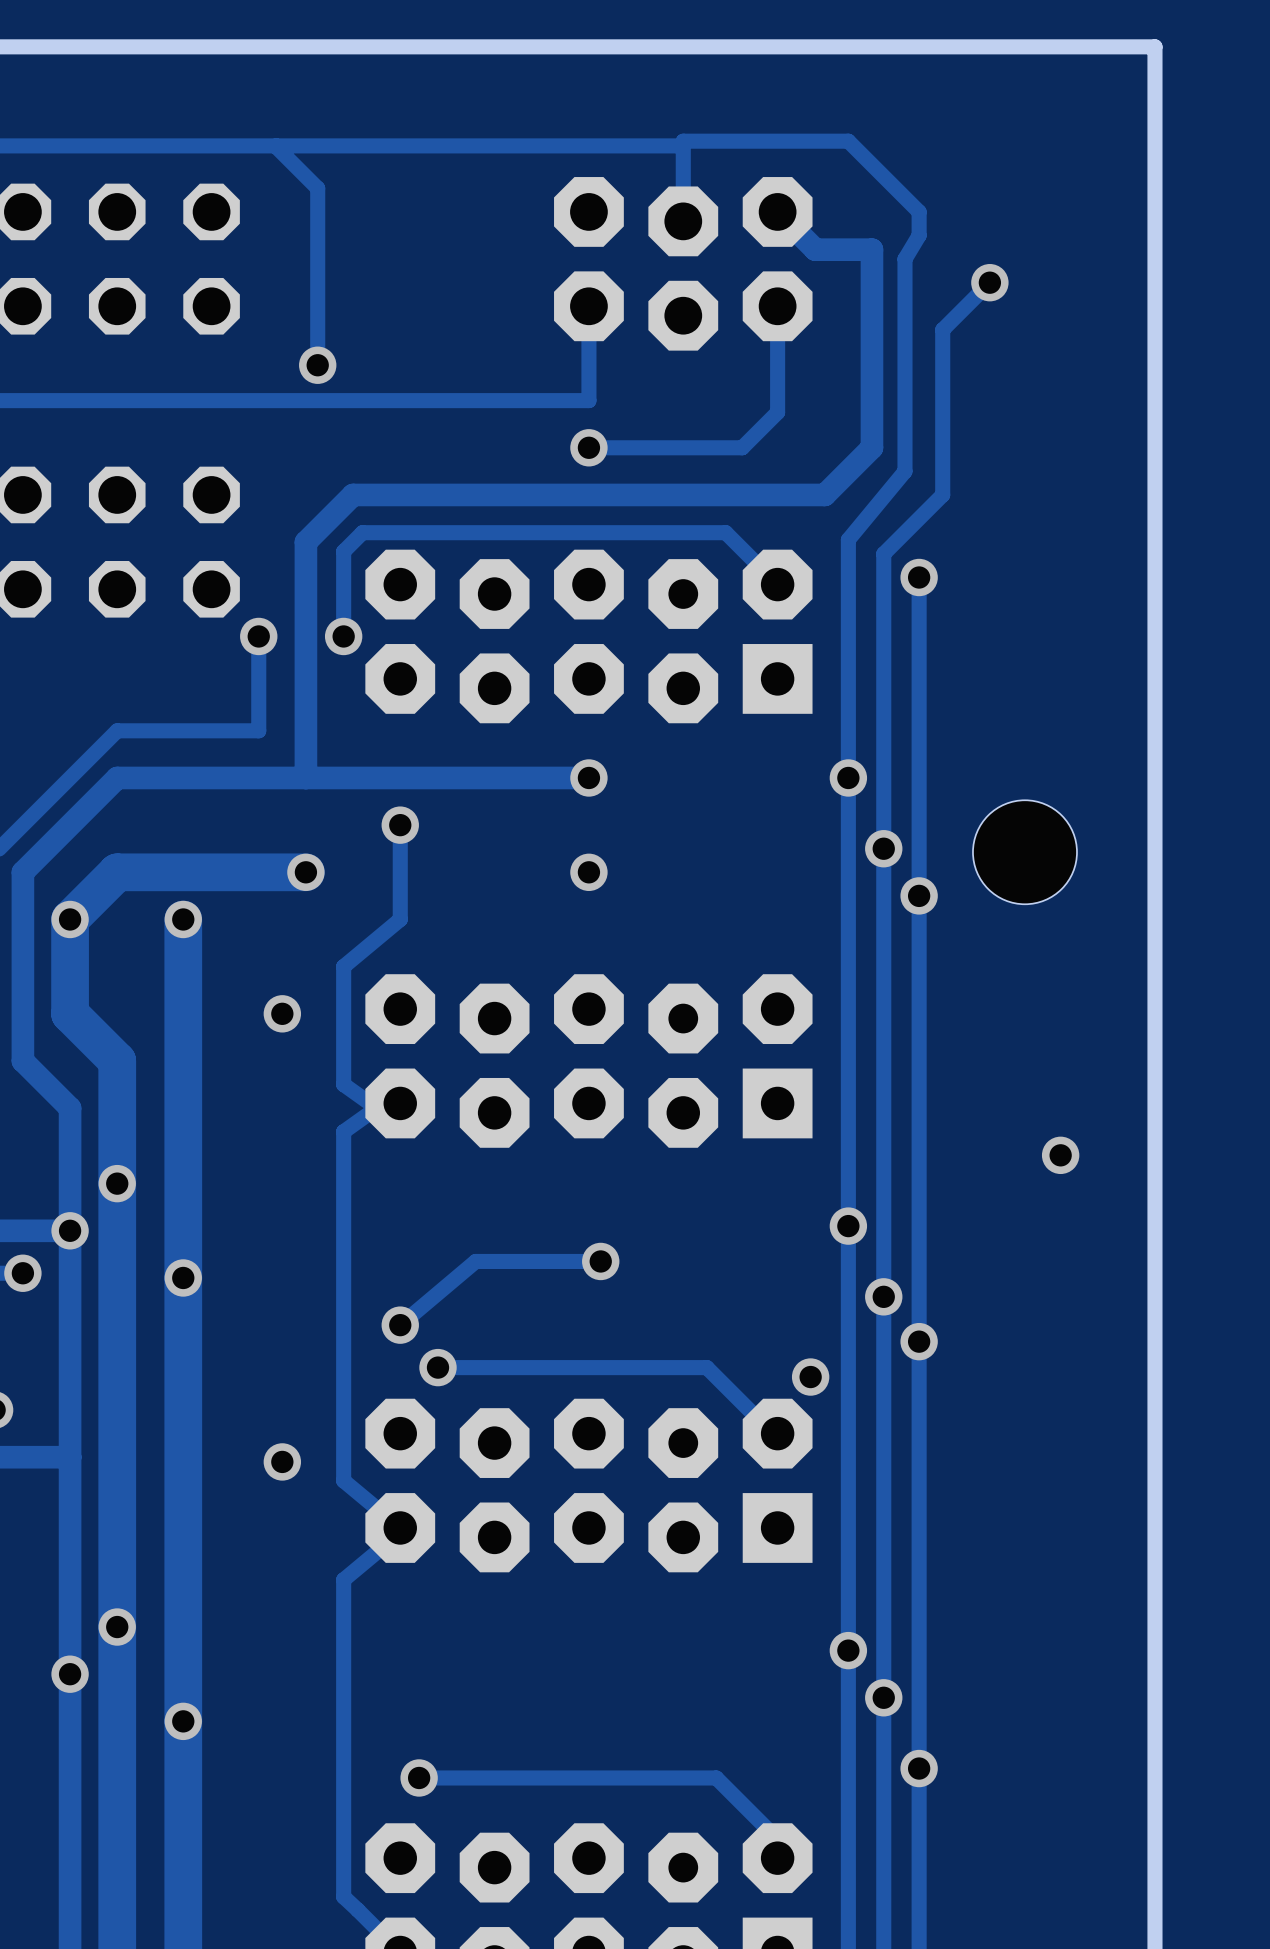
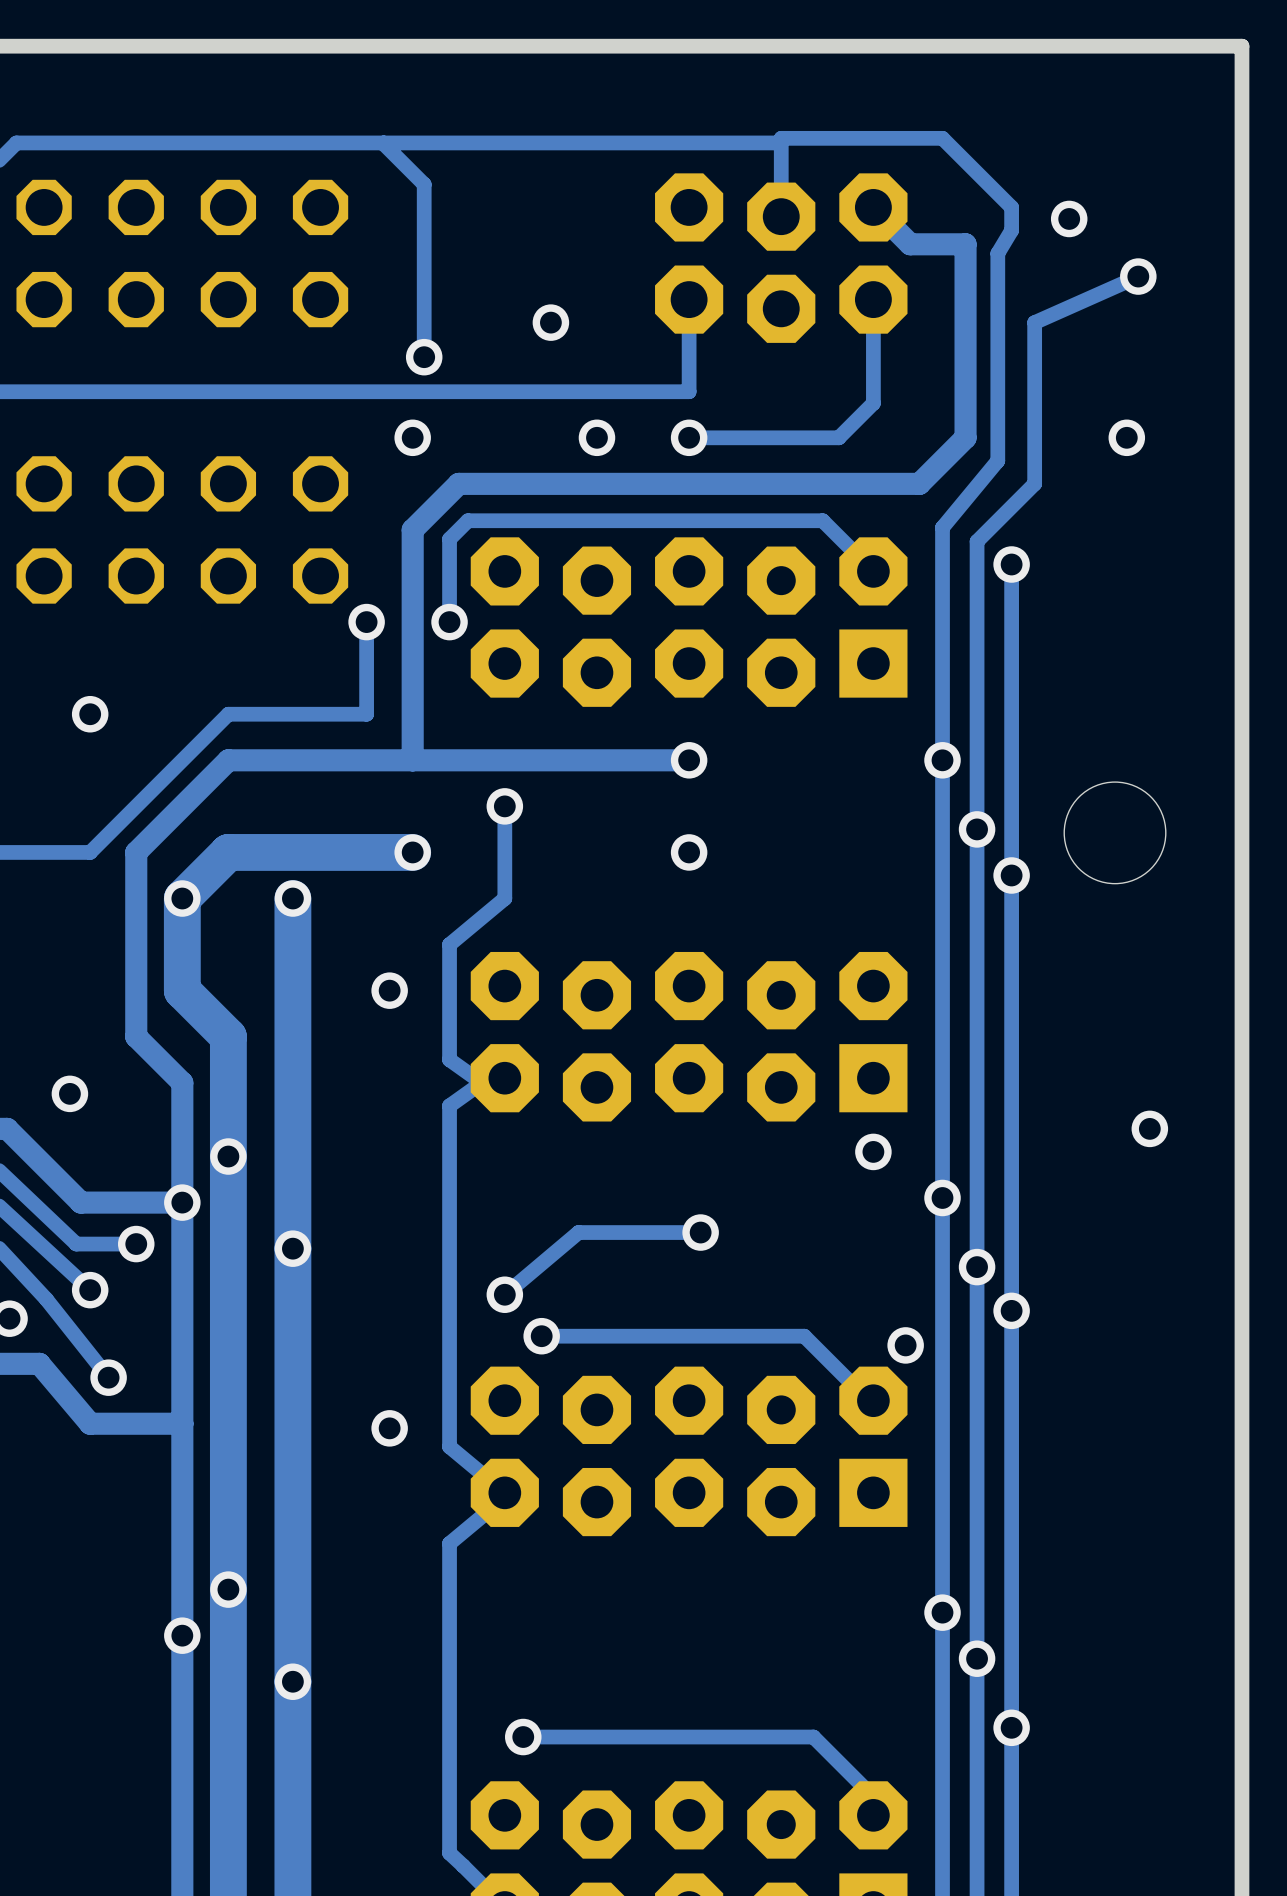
via: none -> (1069, 218)
track: (989, 282) (942, 329) -> (1138, 276) (1034, 322)
via: (989, 282) -> none
via: none -> (1138, 276)
via: none -> (550, 322)
via: none -> (412, 437)
via: none -> (596, 437)
via: none -> (1126, 437)
via: none -> (873, 1151)

